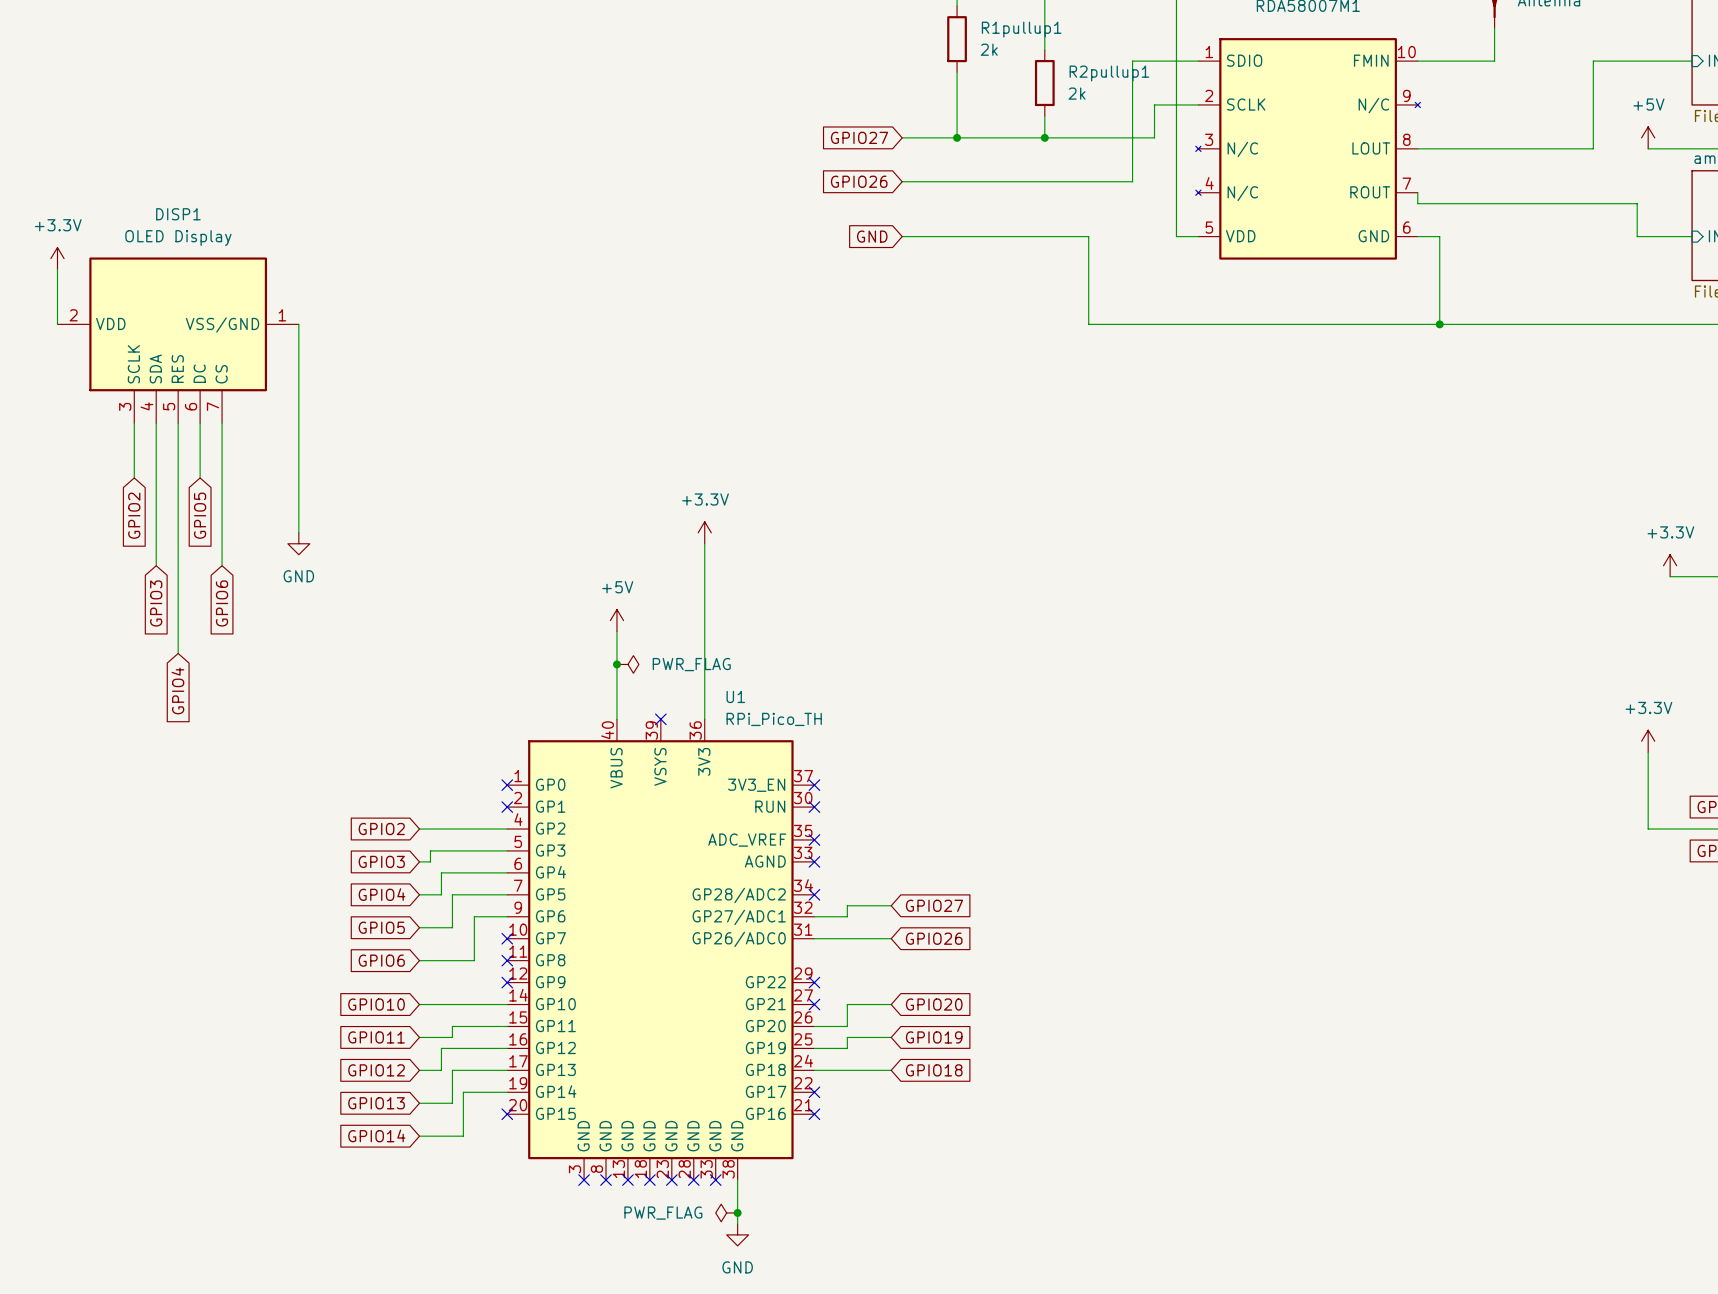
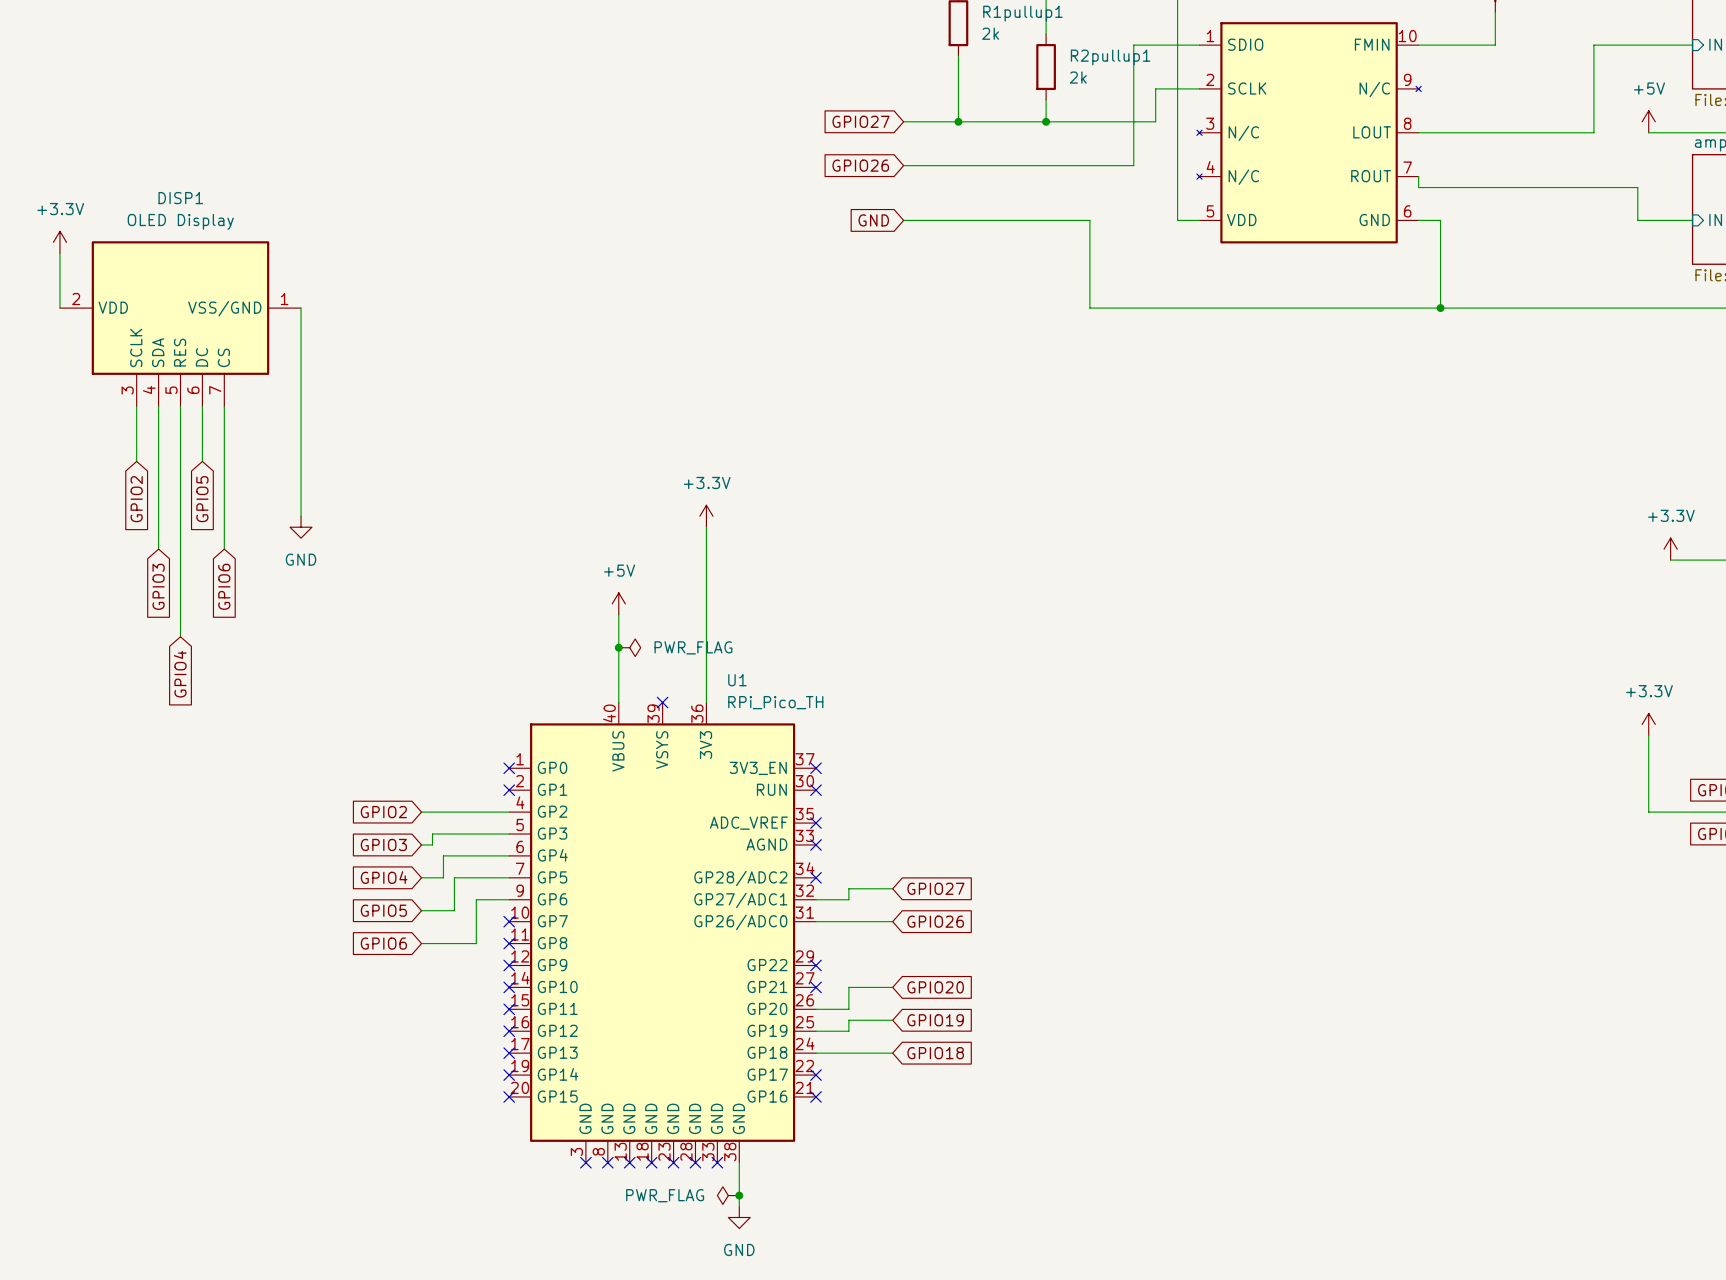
global label: GPIO10 (376, 1004) -> none
wire: (419, 1004) (507, 1004) -> none
no-connect mark: none -> (509, 987)
wire: (507, 1026) (452, 1026) (452, 1037) (419, 1037) -> none
no-connect mark: none -> (509, 1009)
global label: GPIO11 (376, 1037) -> none
wire: (507, 1048) (441, 1048) (441, 1070) (419, 1070) -> none
no-connect mark: none -> (509, 1031)
global label: GPIO12 (376, 1070) -> none
wire: (507, 1070) (452, 1070) (452, 1103) (419, 1103) -> none
no-connect mark: none -> (509, 1053)
wire: (507, 1092) (463, 1092) (463, 1136) (419, 1136) -> none
no-connect mark: none -> (509, 1075)
global label: GPIO13 (376, 1103) -> none
global label: GPIO14 (376, 1135) -> none

